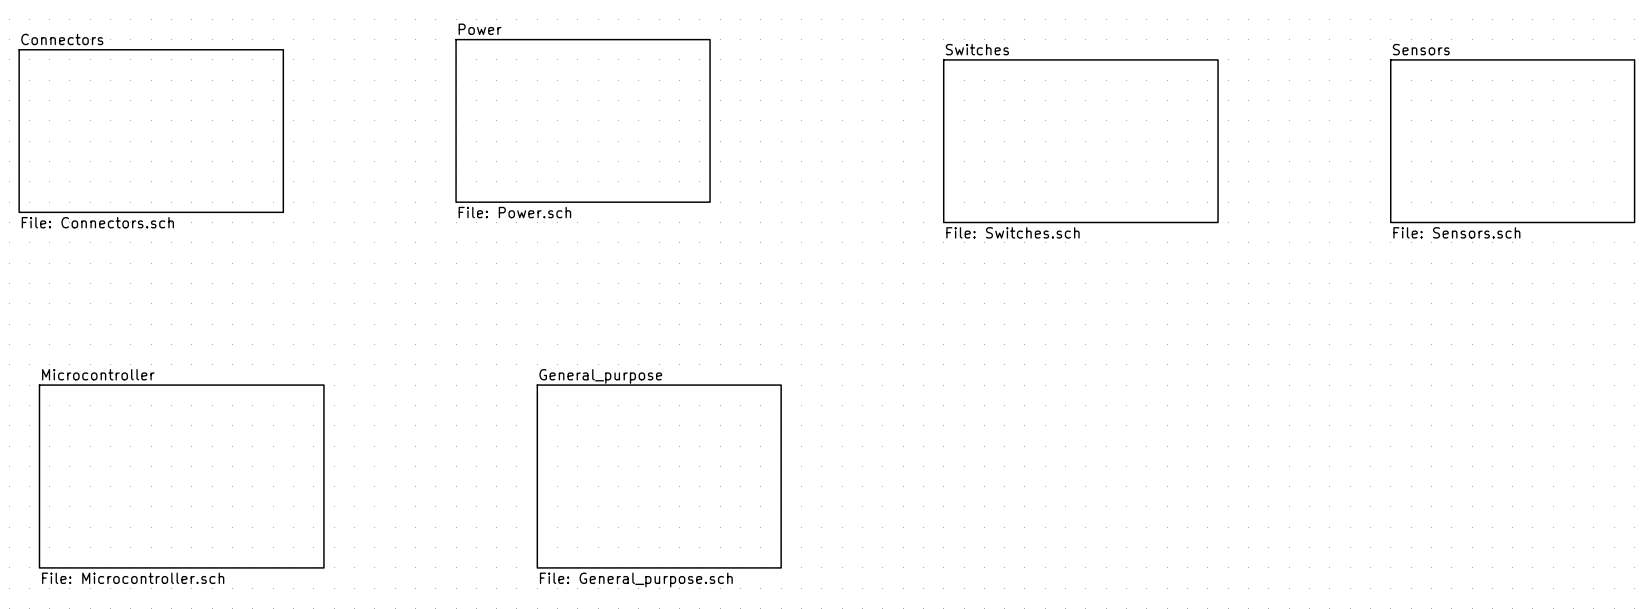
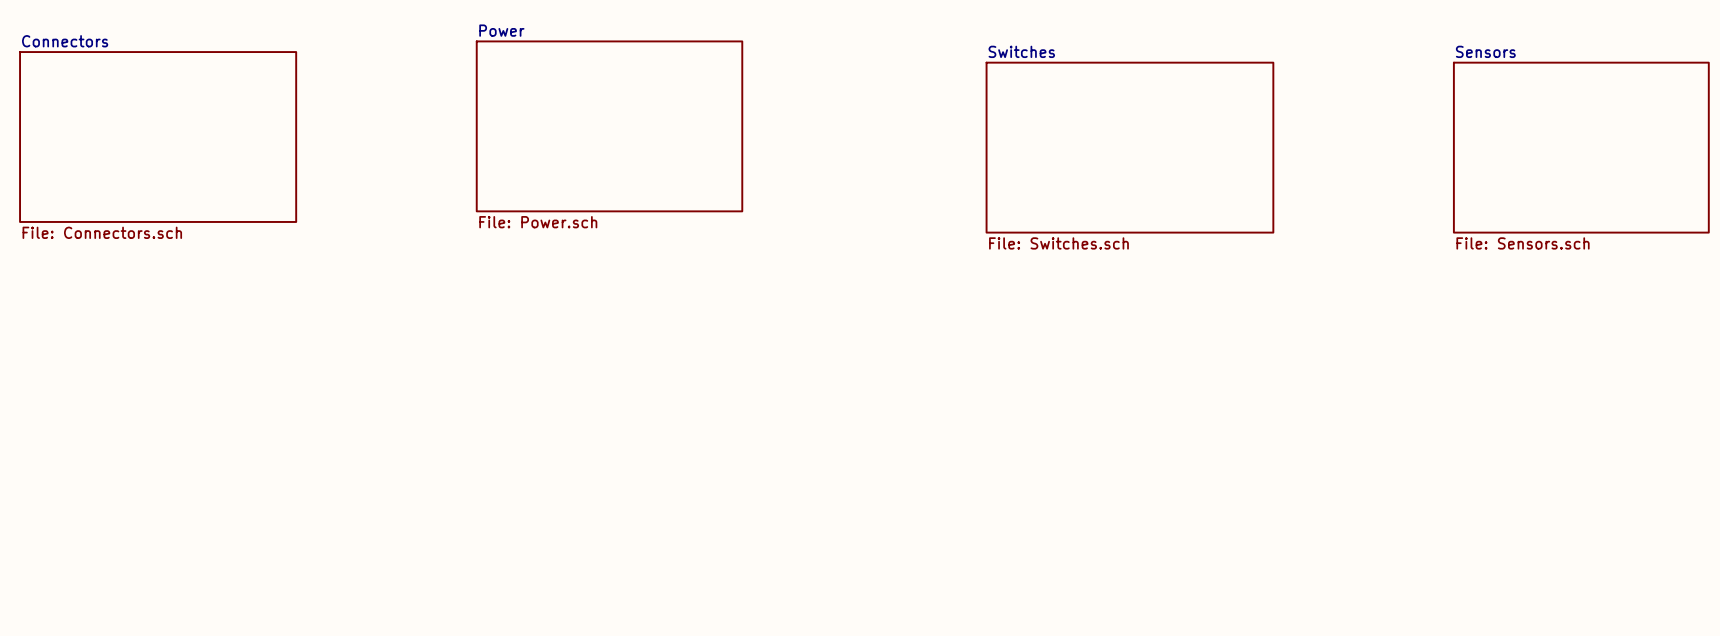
sheet Microcontroller: File: Microcontroller.sch (181, 476) -> none
sheet General_purpose: File: General_purpose.sch (659, 476) -> none

